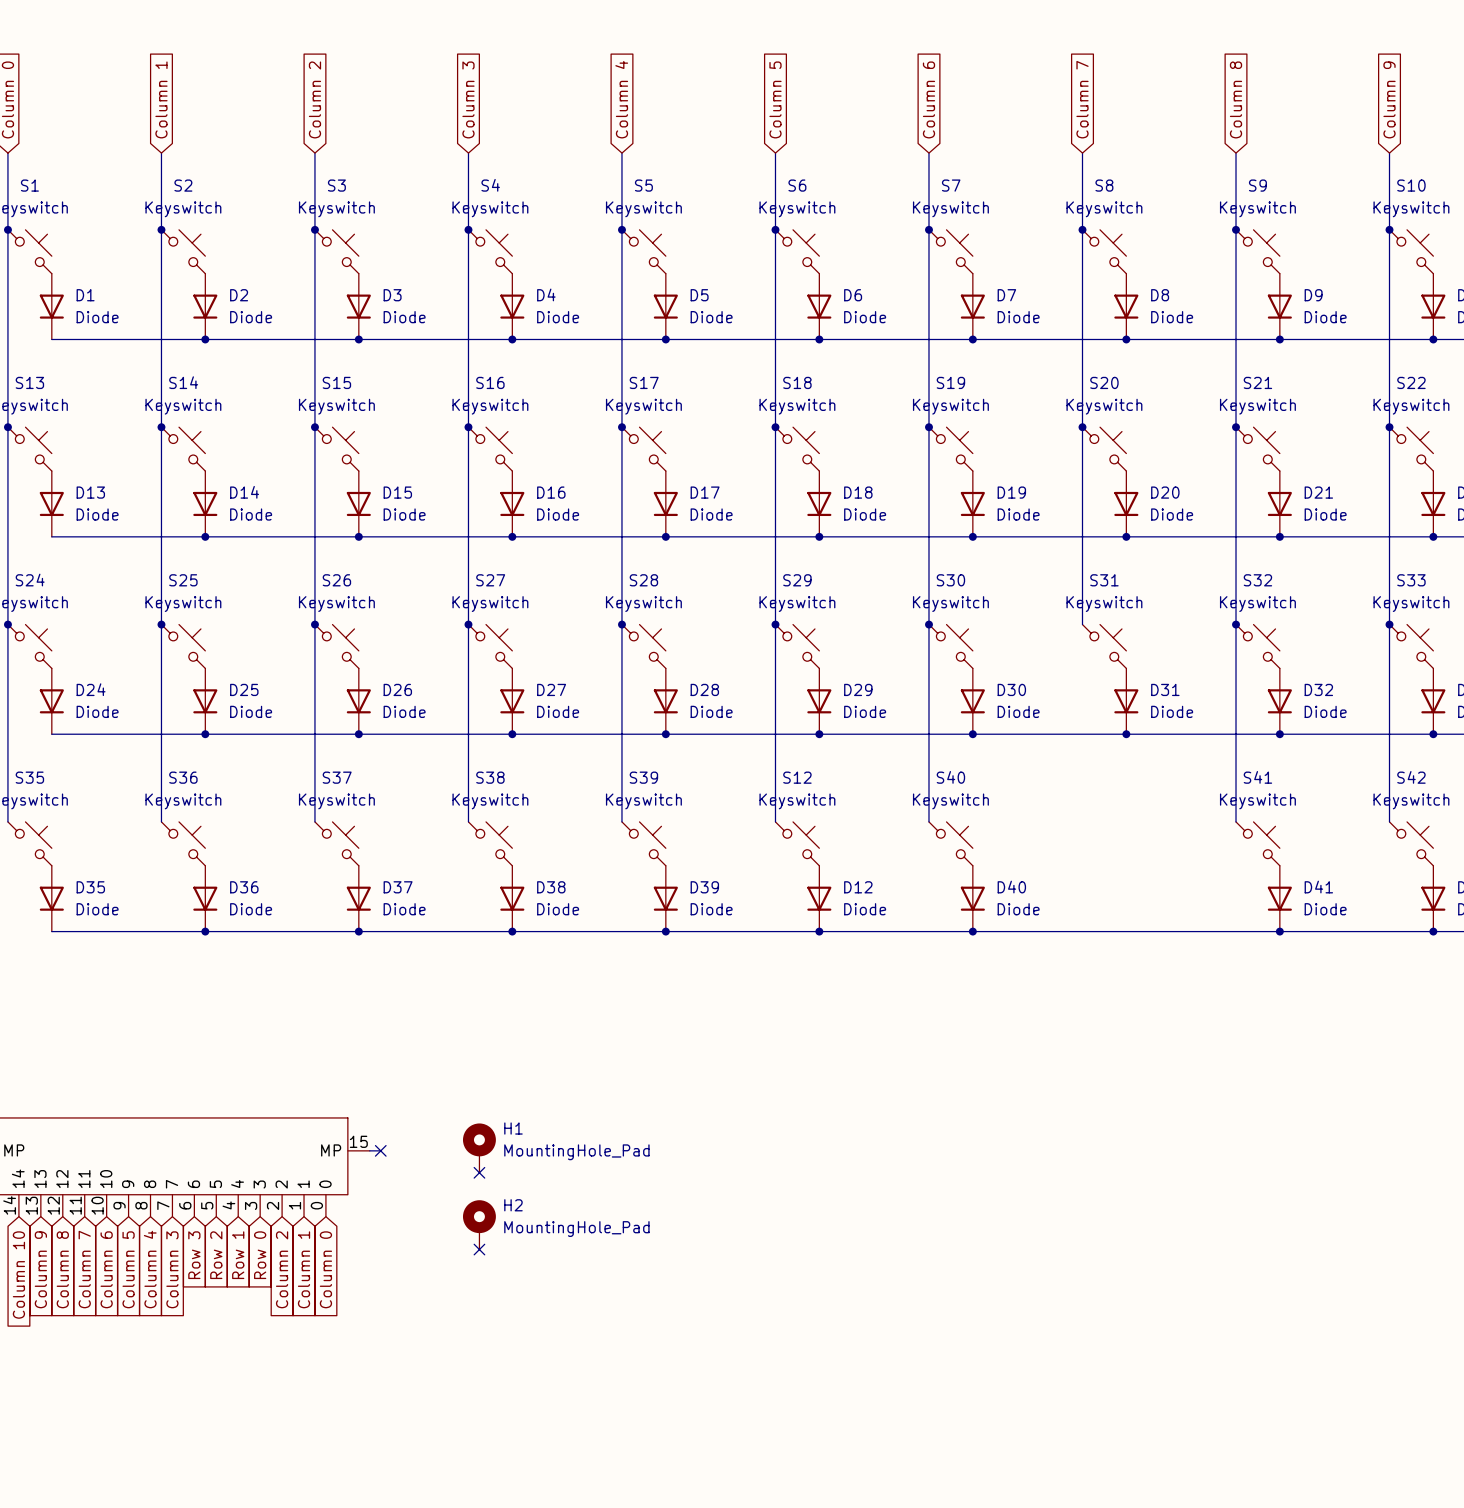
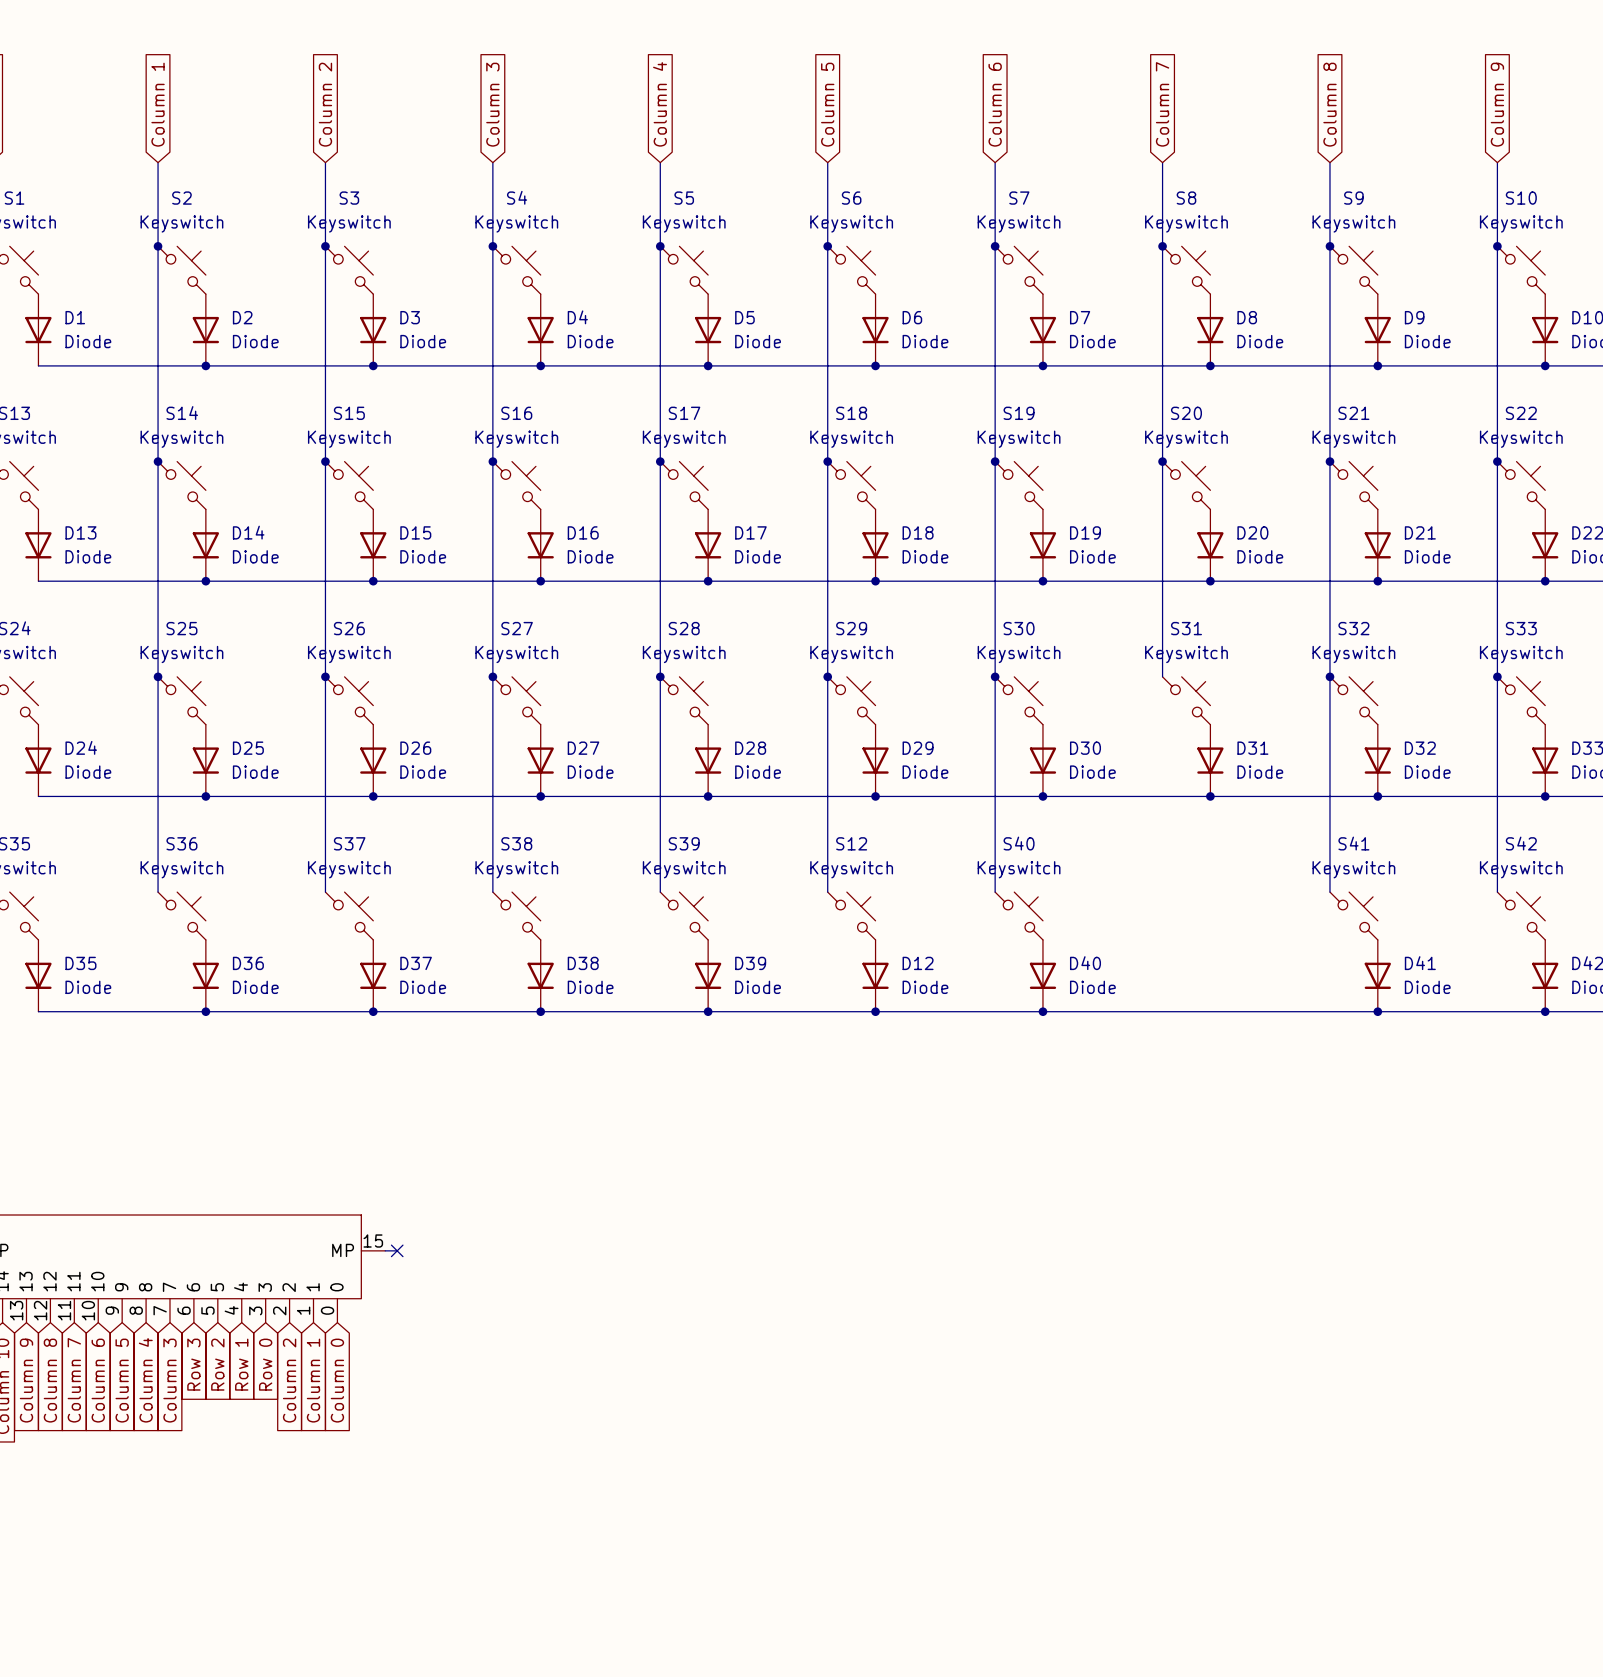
H1: MountingHole_Pad (479, 1148) -> none
no-connect mark: (479, 1172) -> none
H2: MountingHole_Pad (479, 1224) -> none
no-connect mark: (479, 1249) -> none

